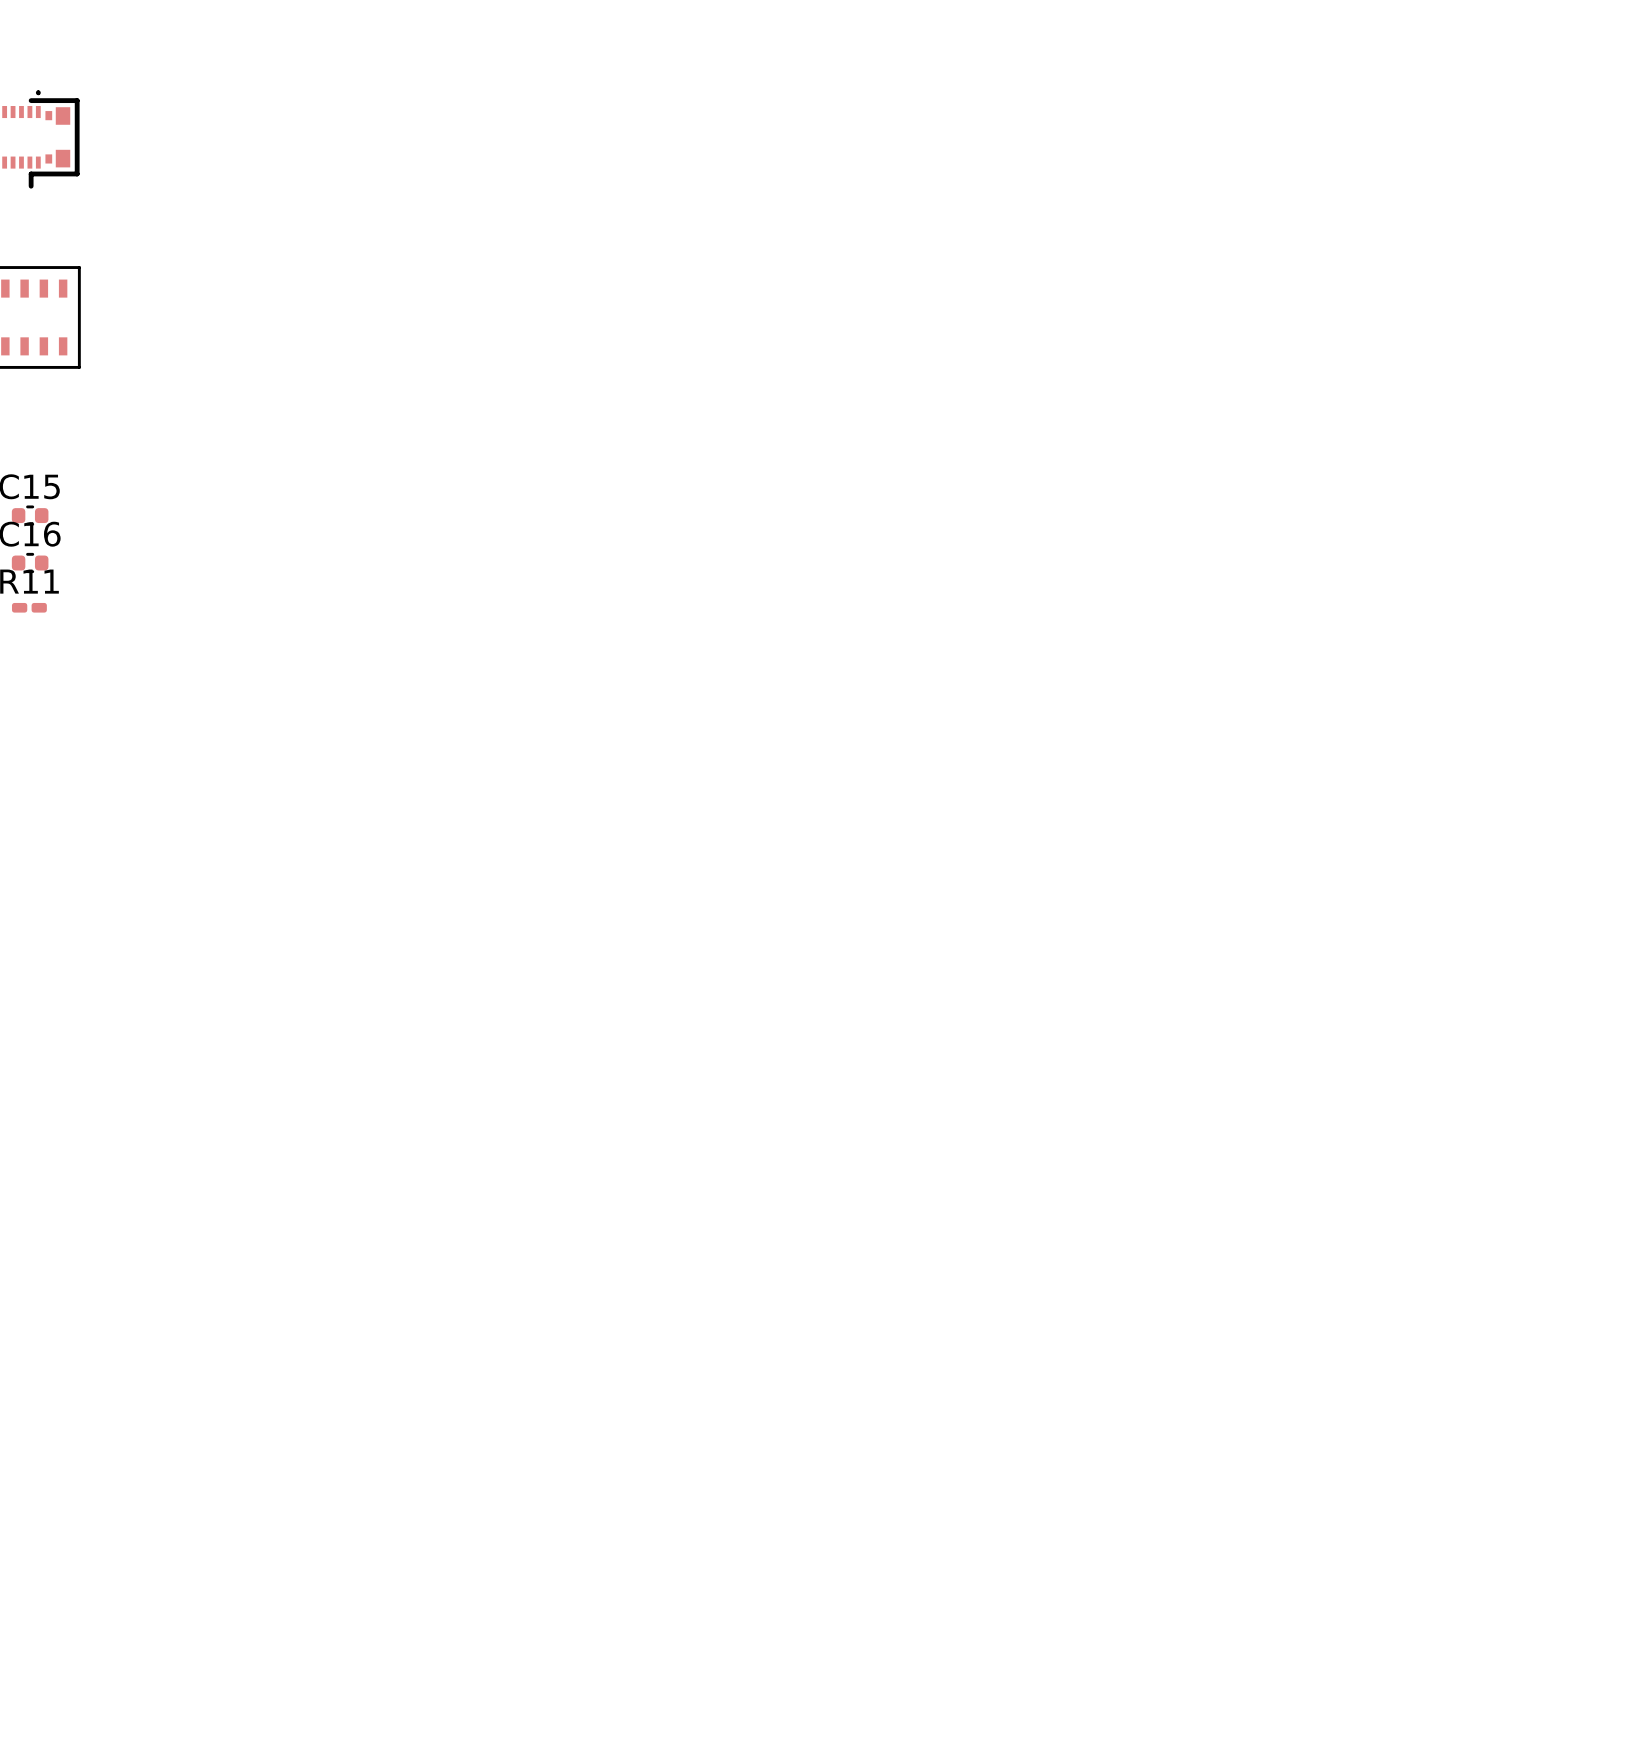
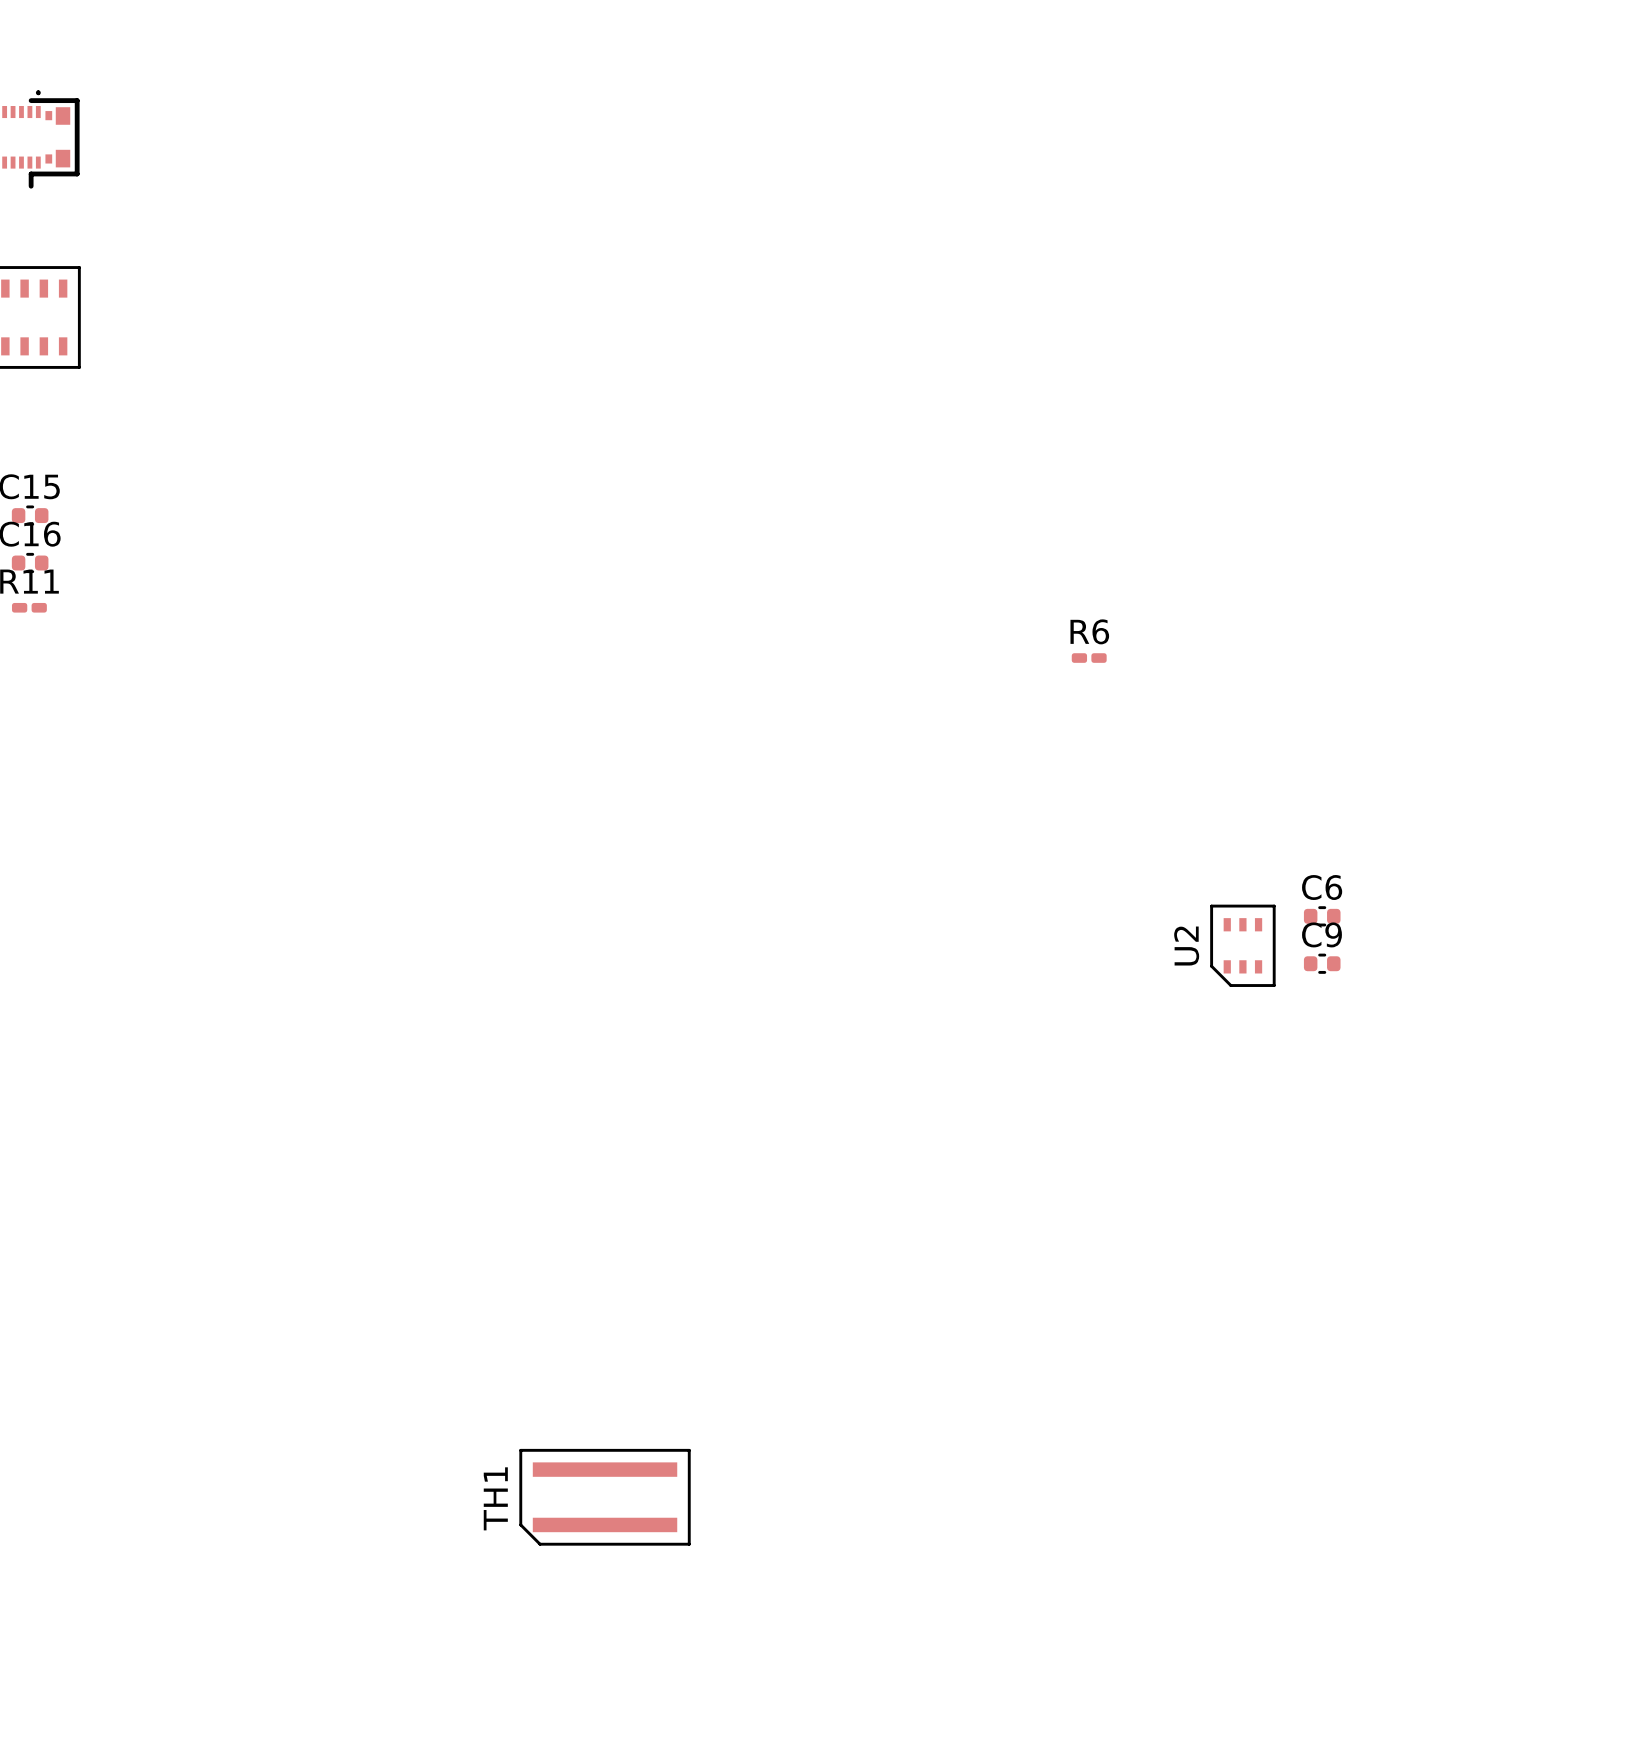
R6: none -> (1089, 658)
C6: none -> (1322, 916)
U2: none -> (1242, 945)
C9: none -> (1322, 963)
TH1: none -> (605, 1497)

